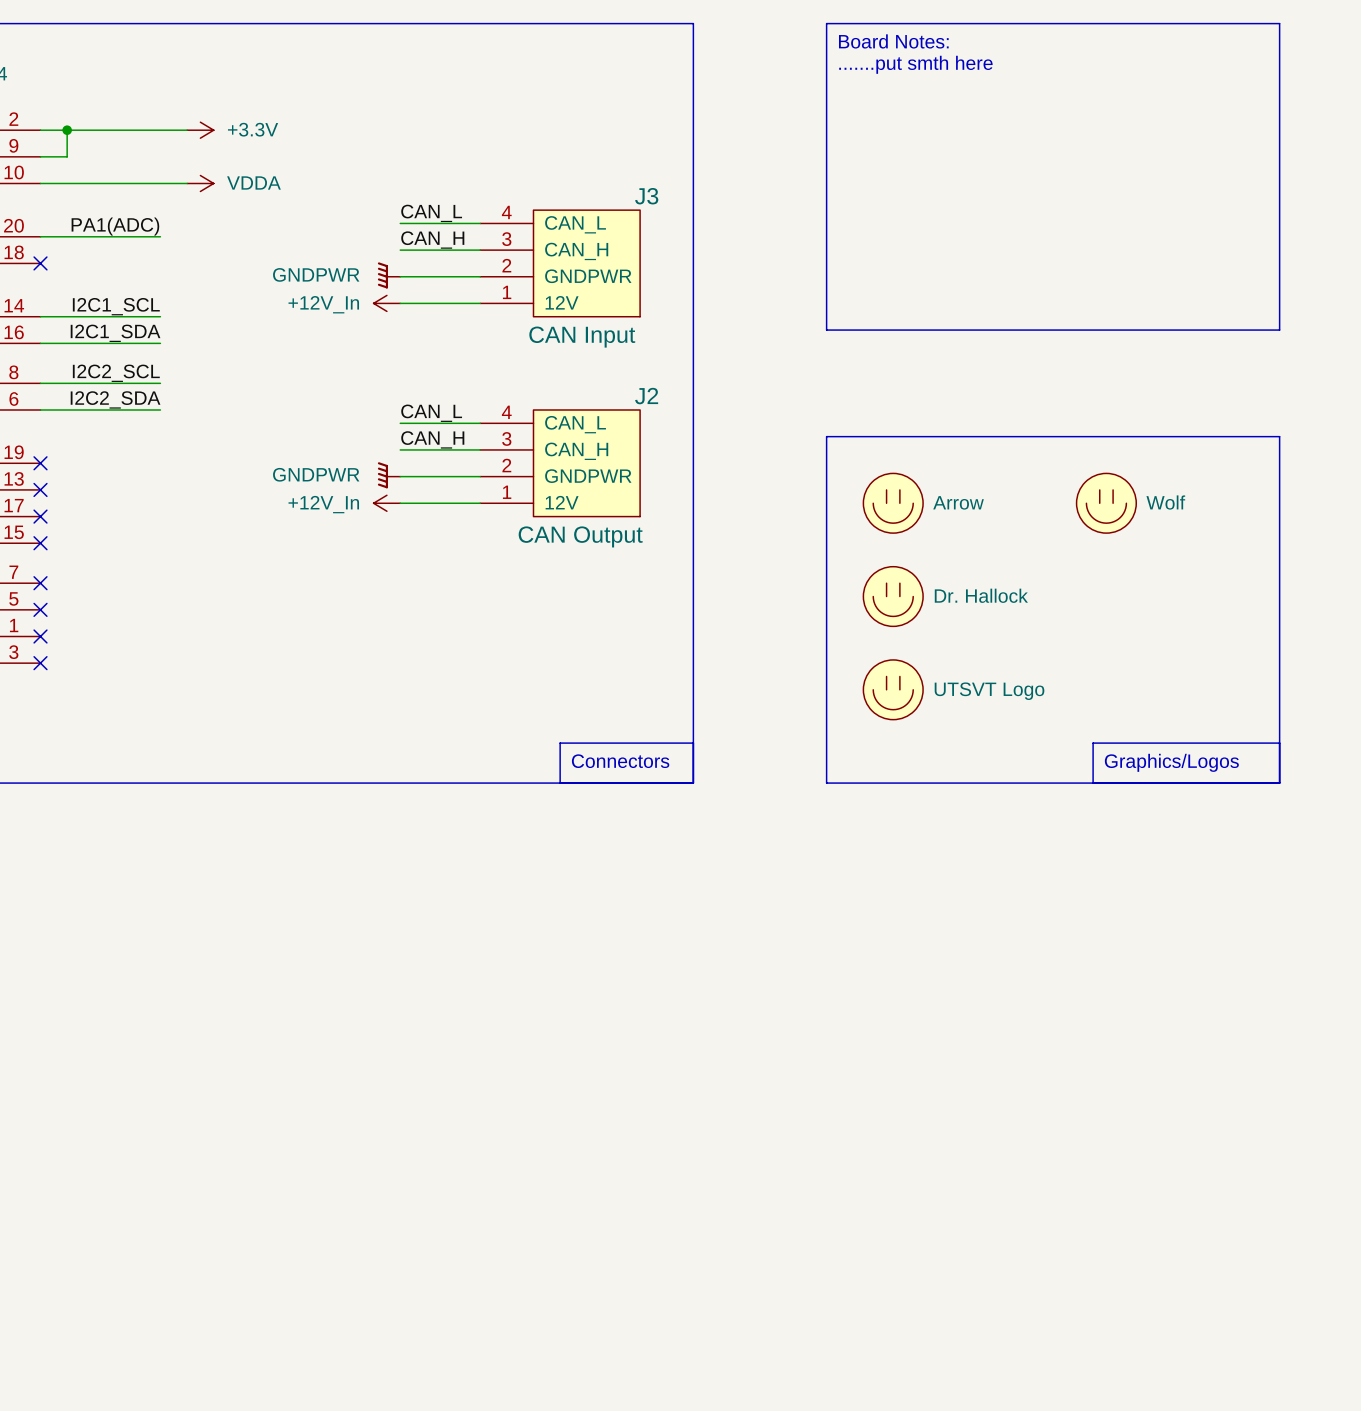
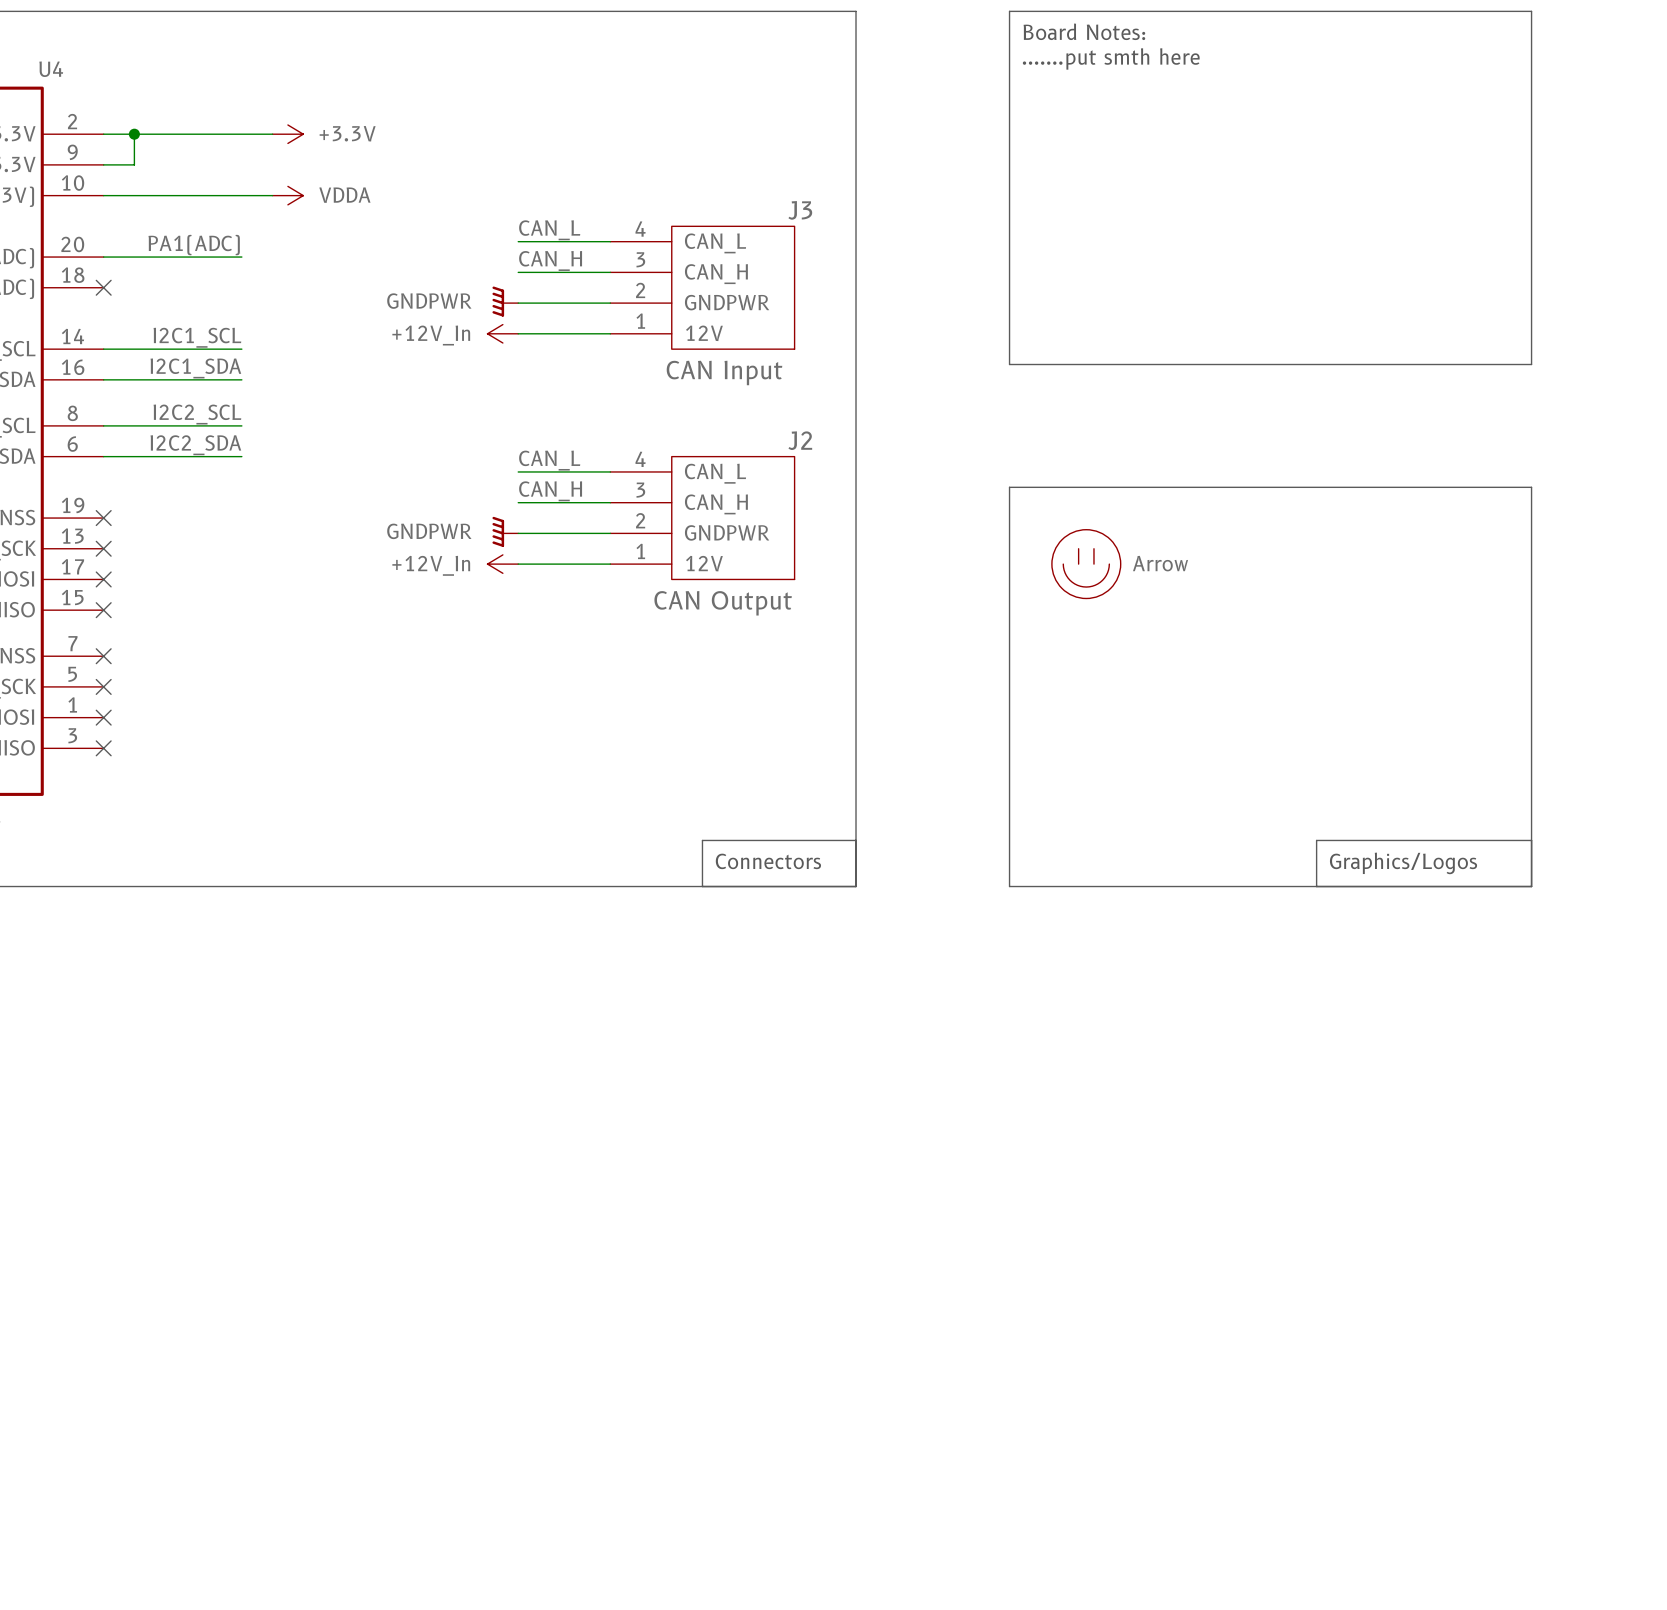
part: Wolf (1106, 503) -> none
part: Dr. Hallock (893, 596) -> none
part: UTSVT Logo (893, 689) -> none

